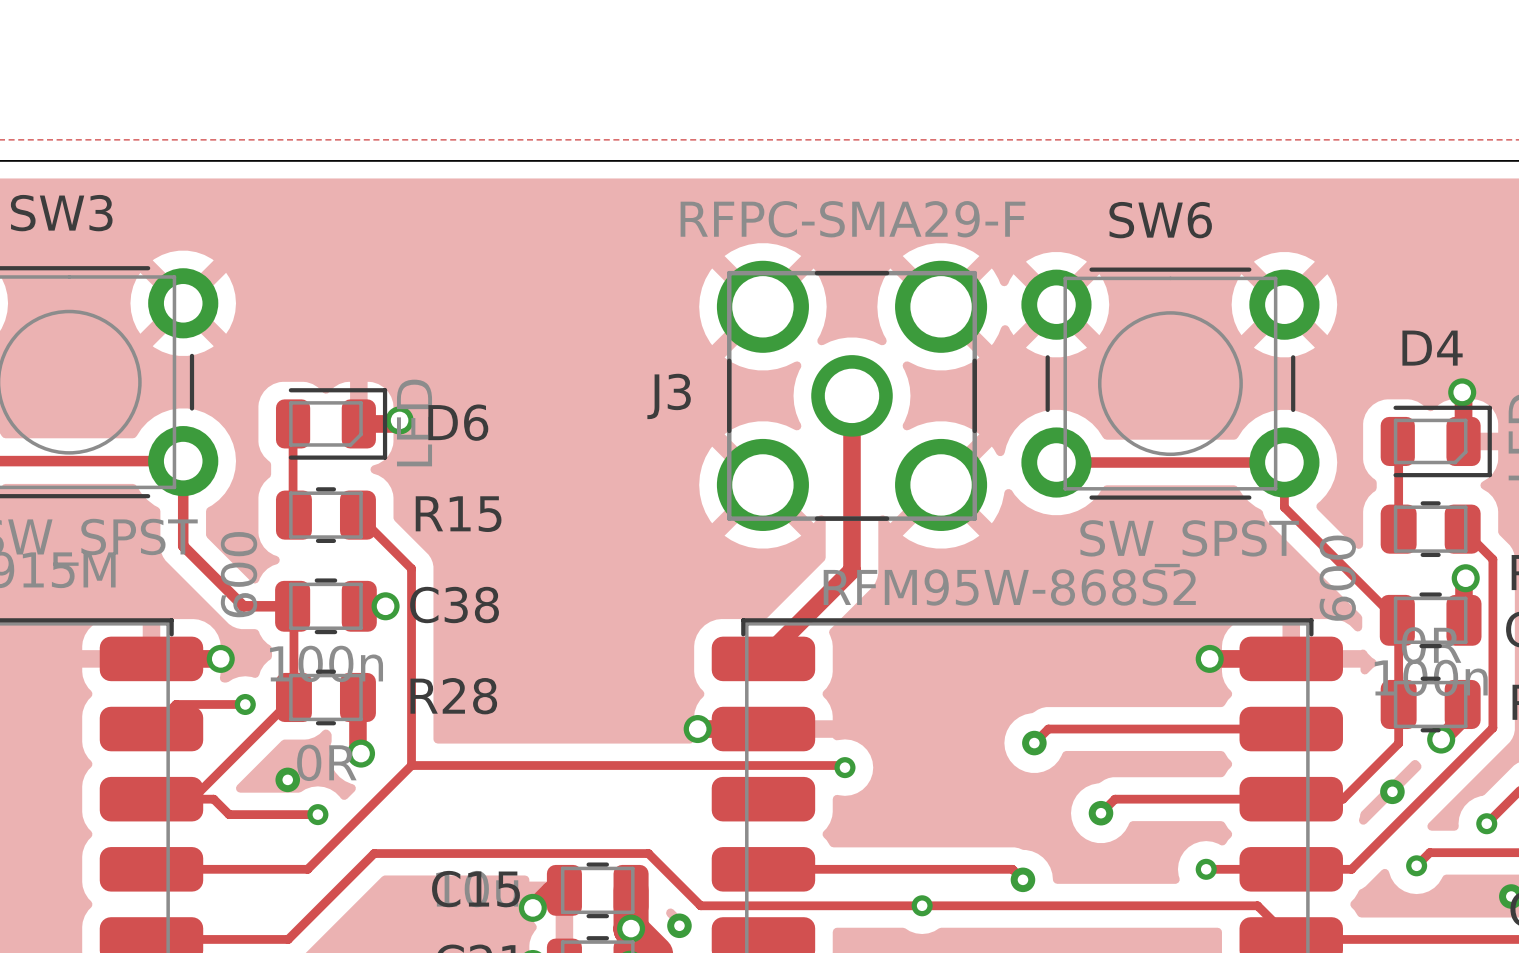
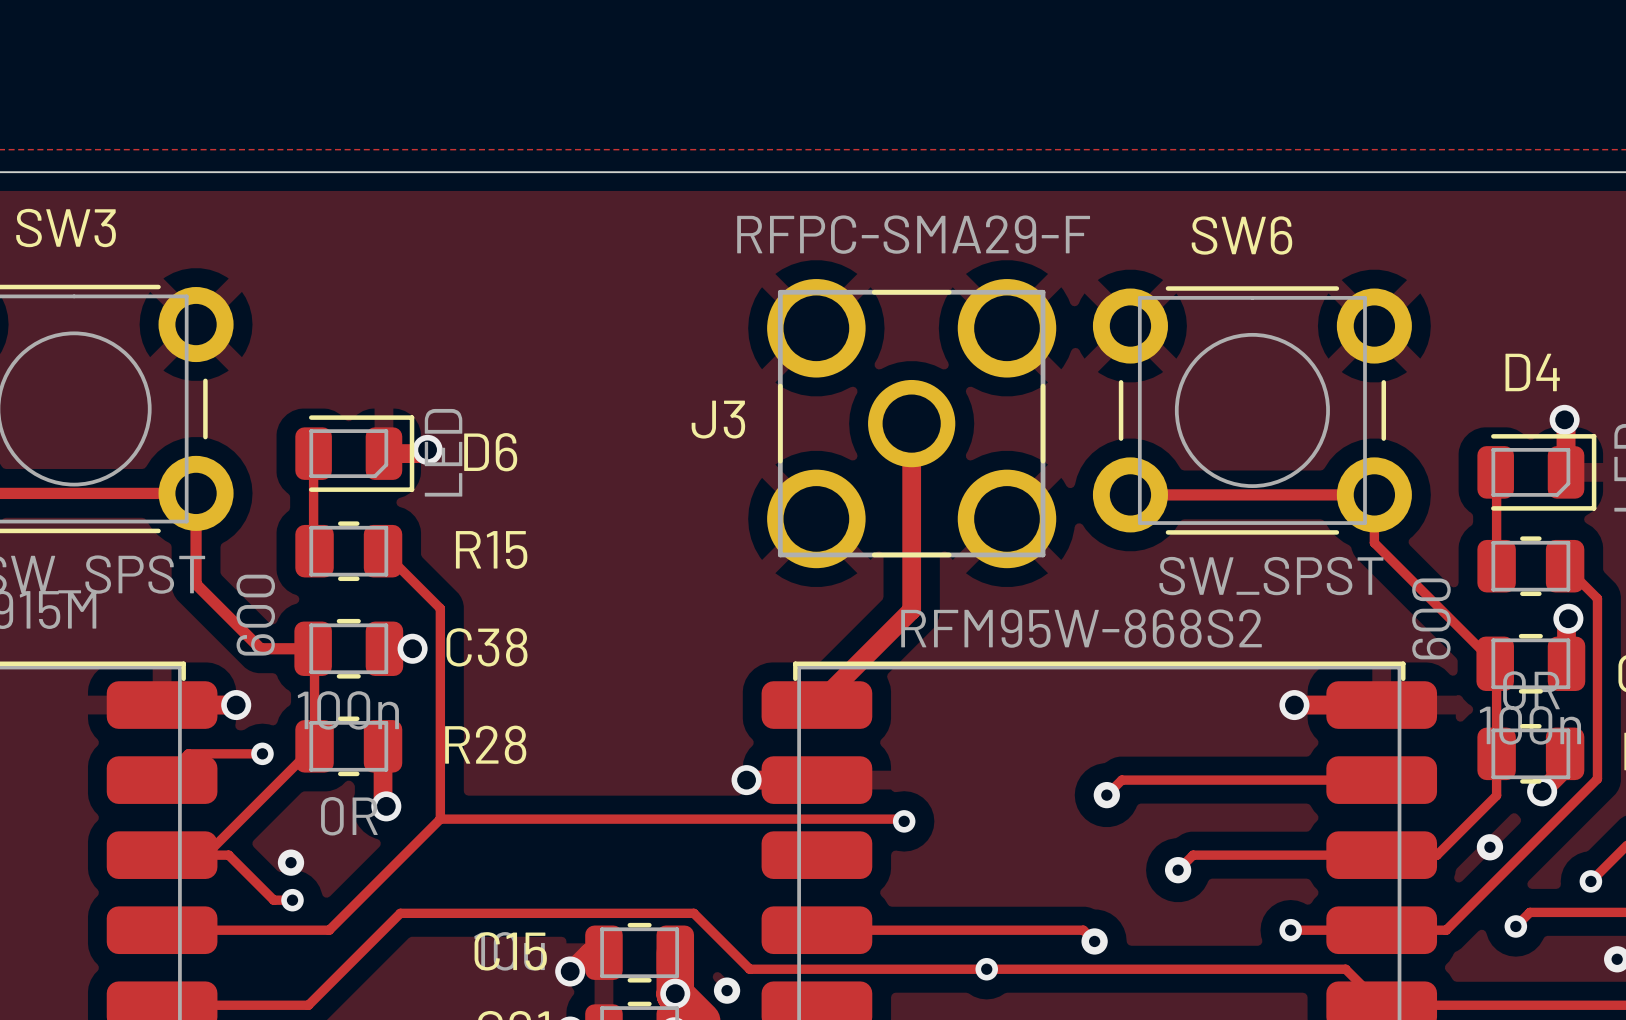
via position: (287, 779) -> (291, 862)
track: (229, 814) (317, 814) -> (245, 871) (273, 900) (292, 900)
via position: (317, 814) -> (292, 900)

